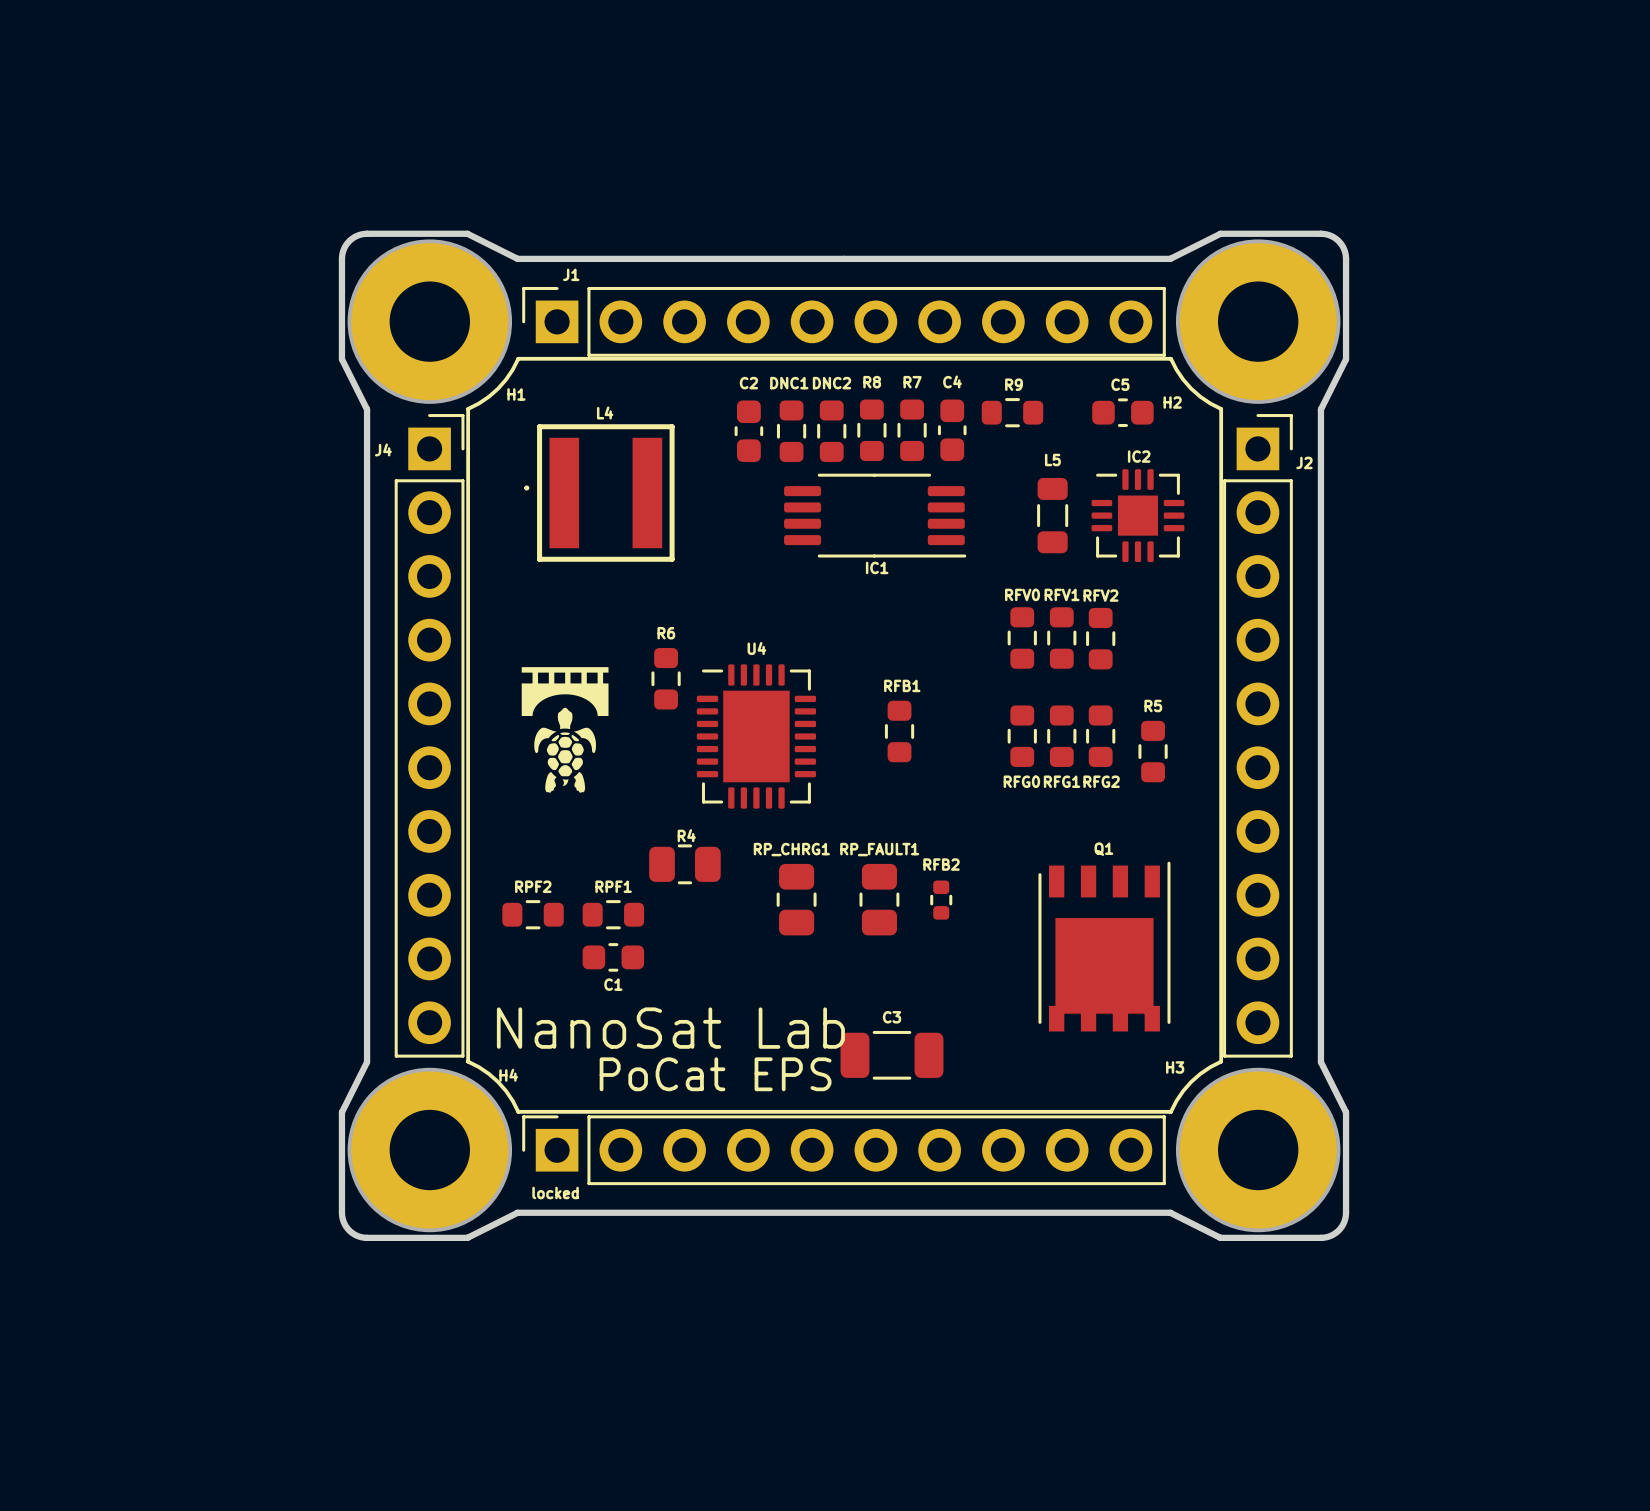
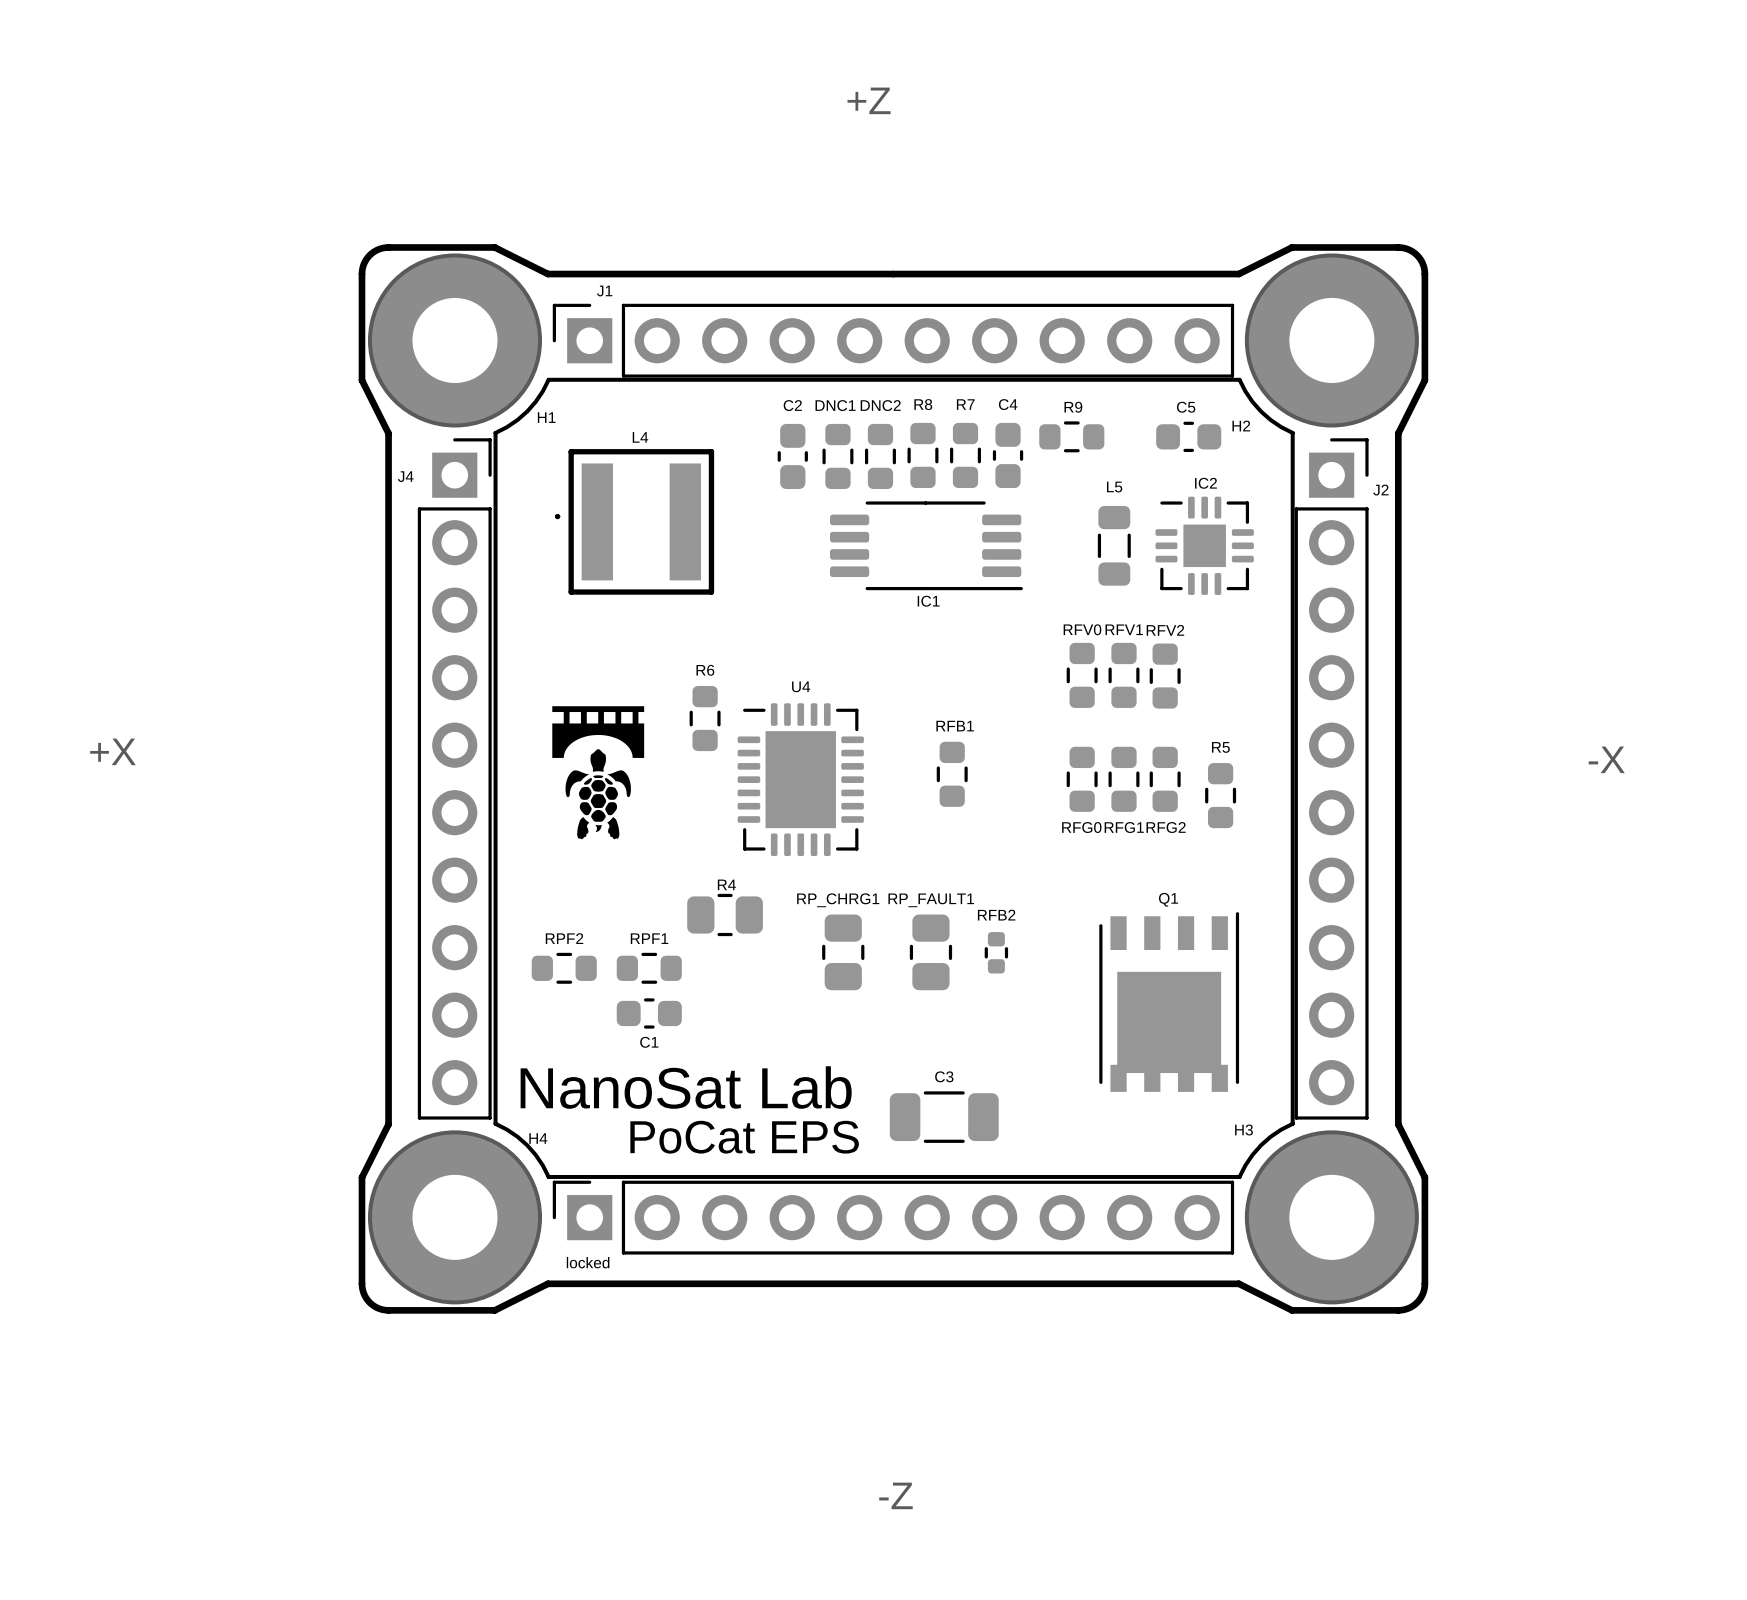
text: none -> +Z (869, 100)
text: none -> +X (112, 751)
text: none -> -X (1606, 759)
text: none -> -Z (895, 1495)

